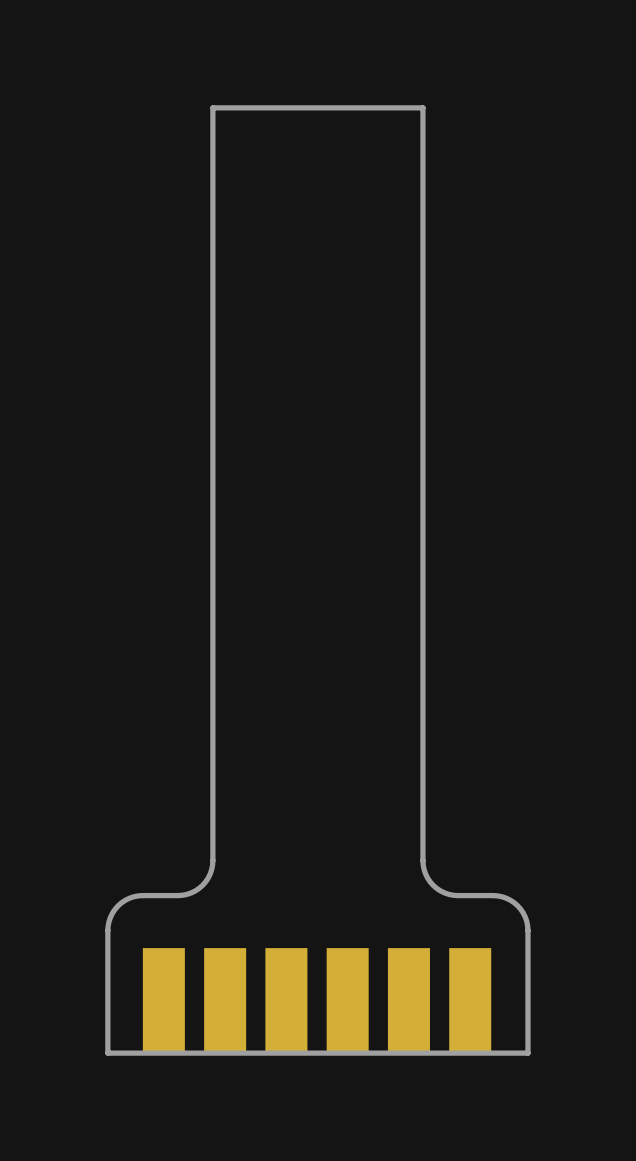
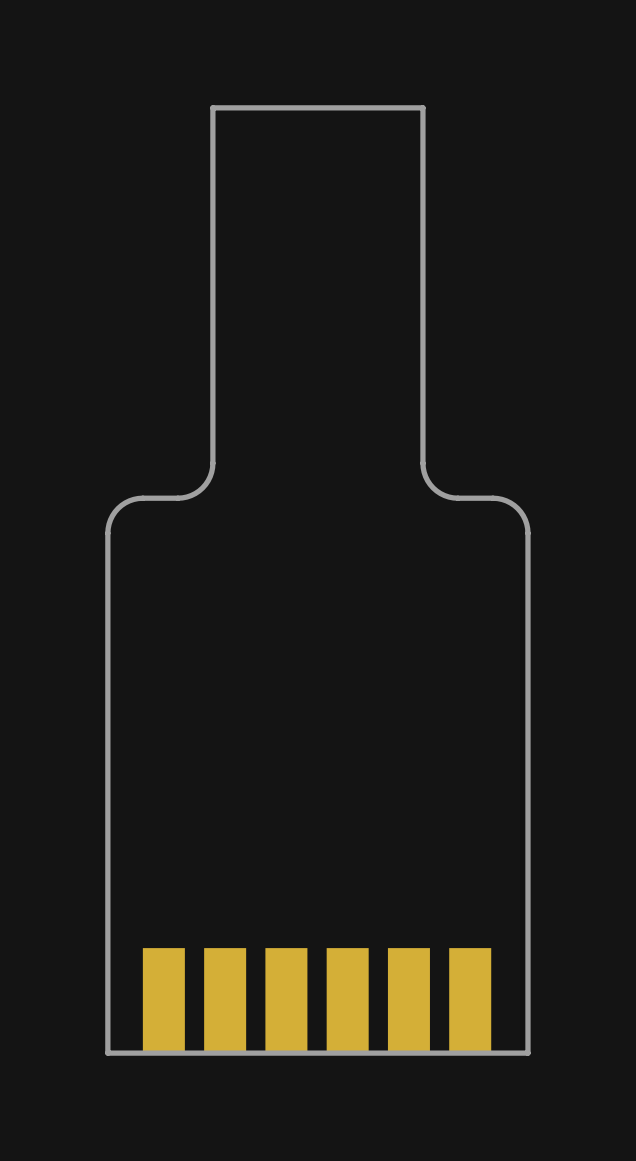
board edge: (212, 463) (211, 869) (202, 885) (191, 892) (177, 895) (138, 895) (125, 900) (112, 913) (107, 930) -> (212, 463) (208, 480) (195, 493) (182, 497) (142, 498) (129, 500) (118, 508) (109, 524) (107, 930)
board edge: (422, 463) (424, 869) (433, 885) (444, 892) (457, 895) (497, 895) (510, 900) (523, 913) (527, 930) -> (422, 463) (427, 480) (440, 493) (453, 497) (492, 498) (506, 500) (517, 508) (526, 524) (527, 930)

